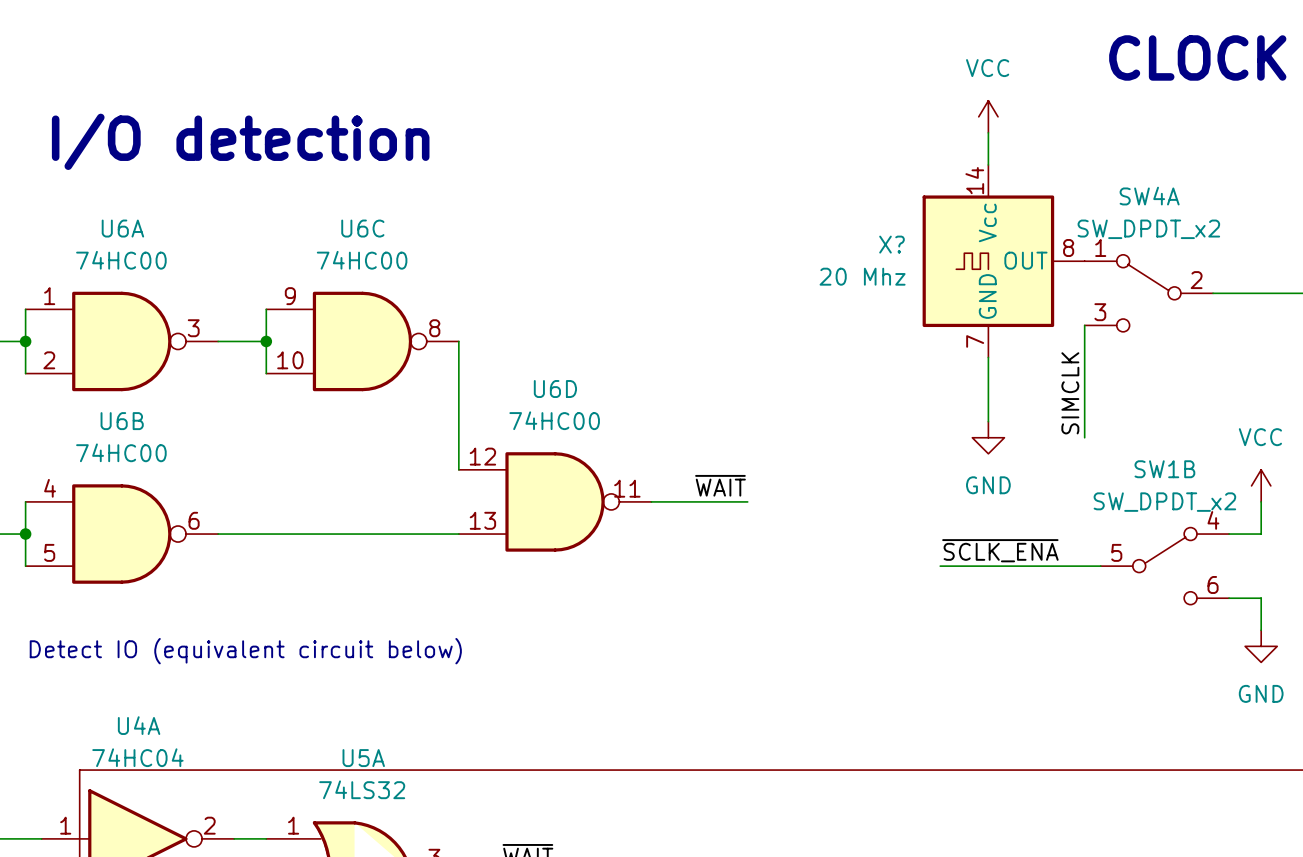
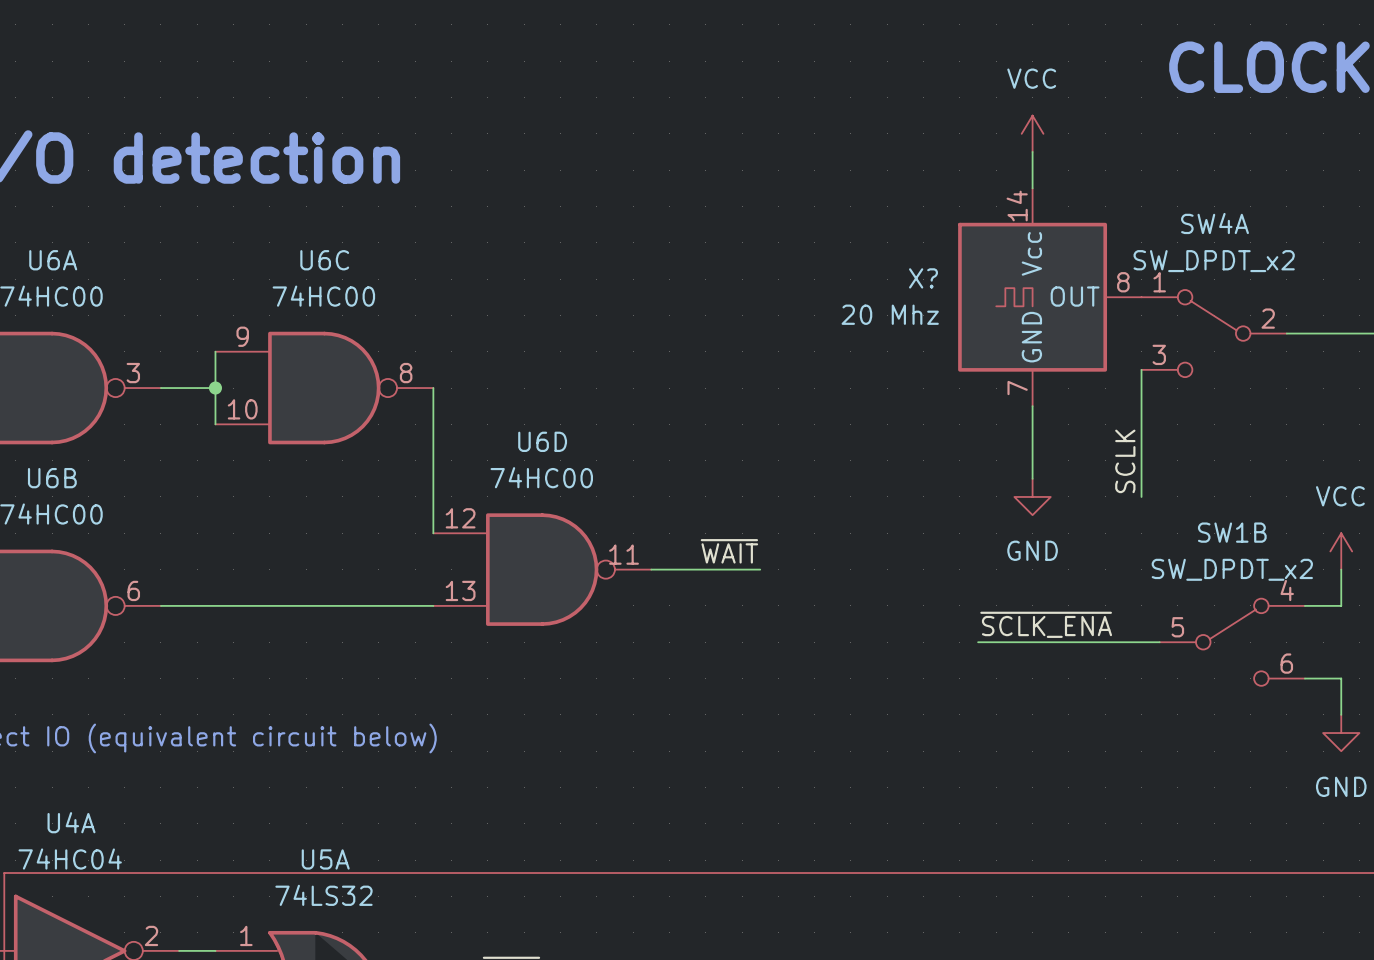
label: SIMCLK (1070, 393) -> SCLK (1125, 461)

